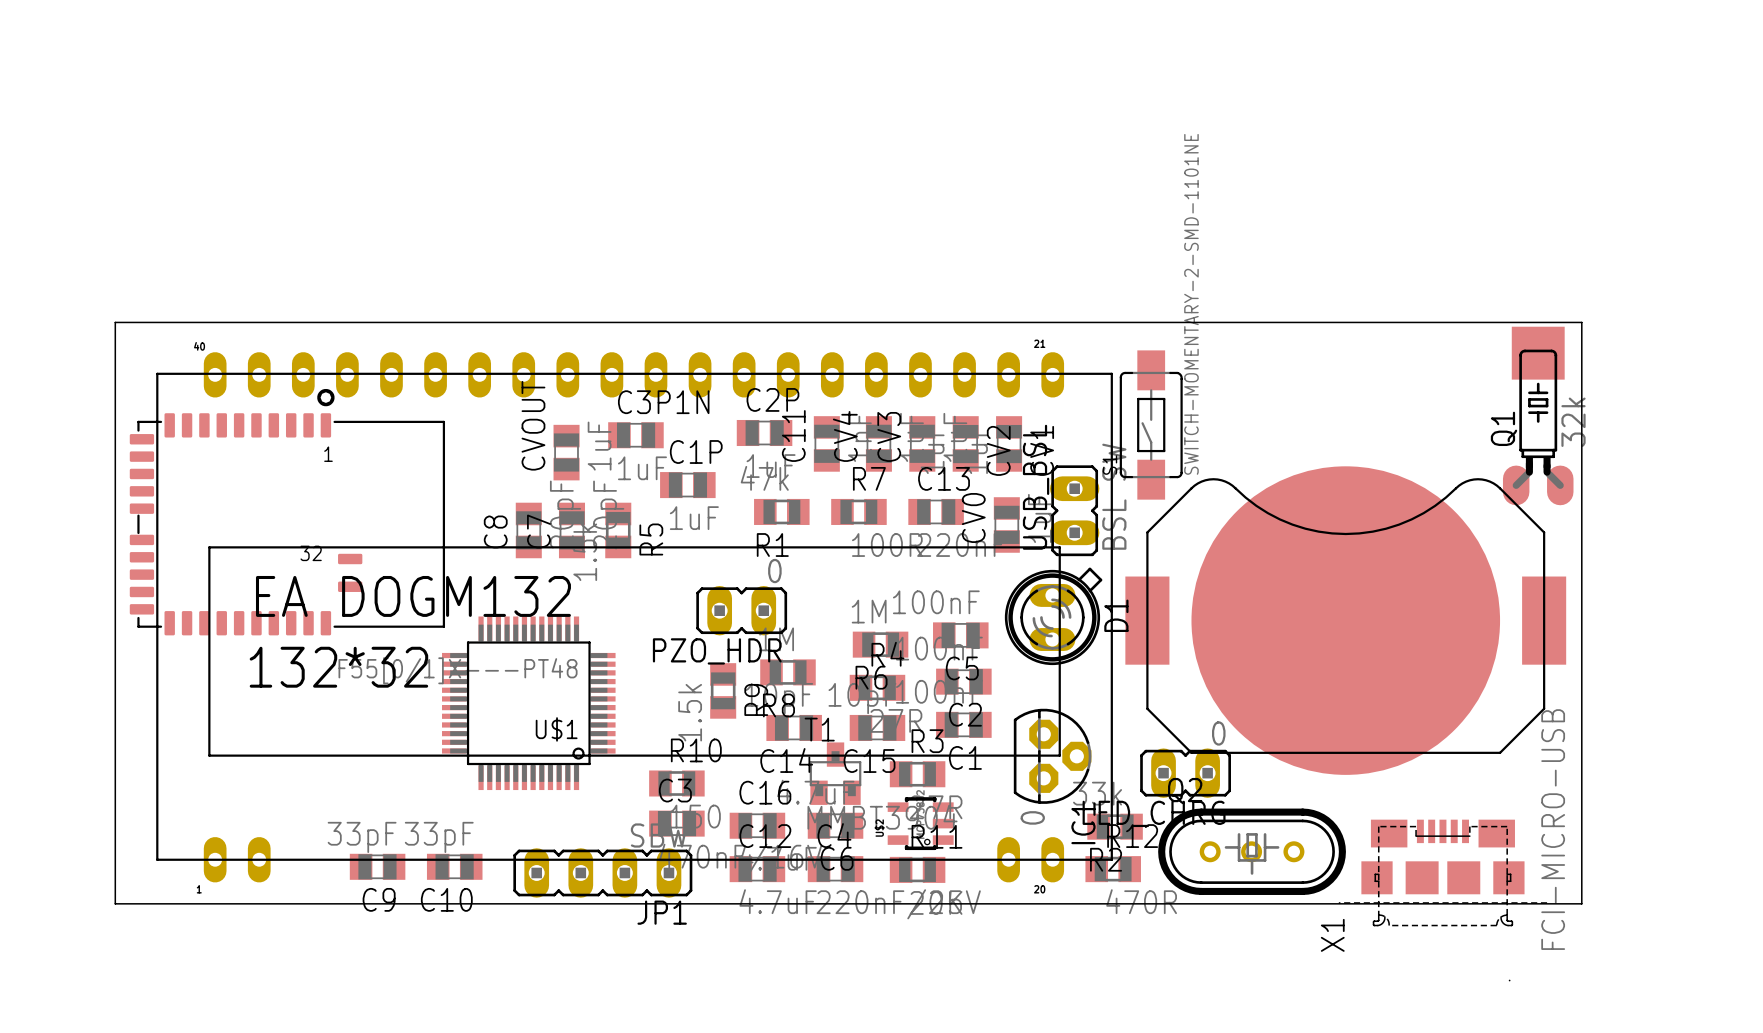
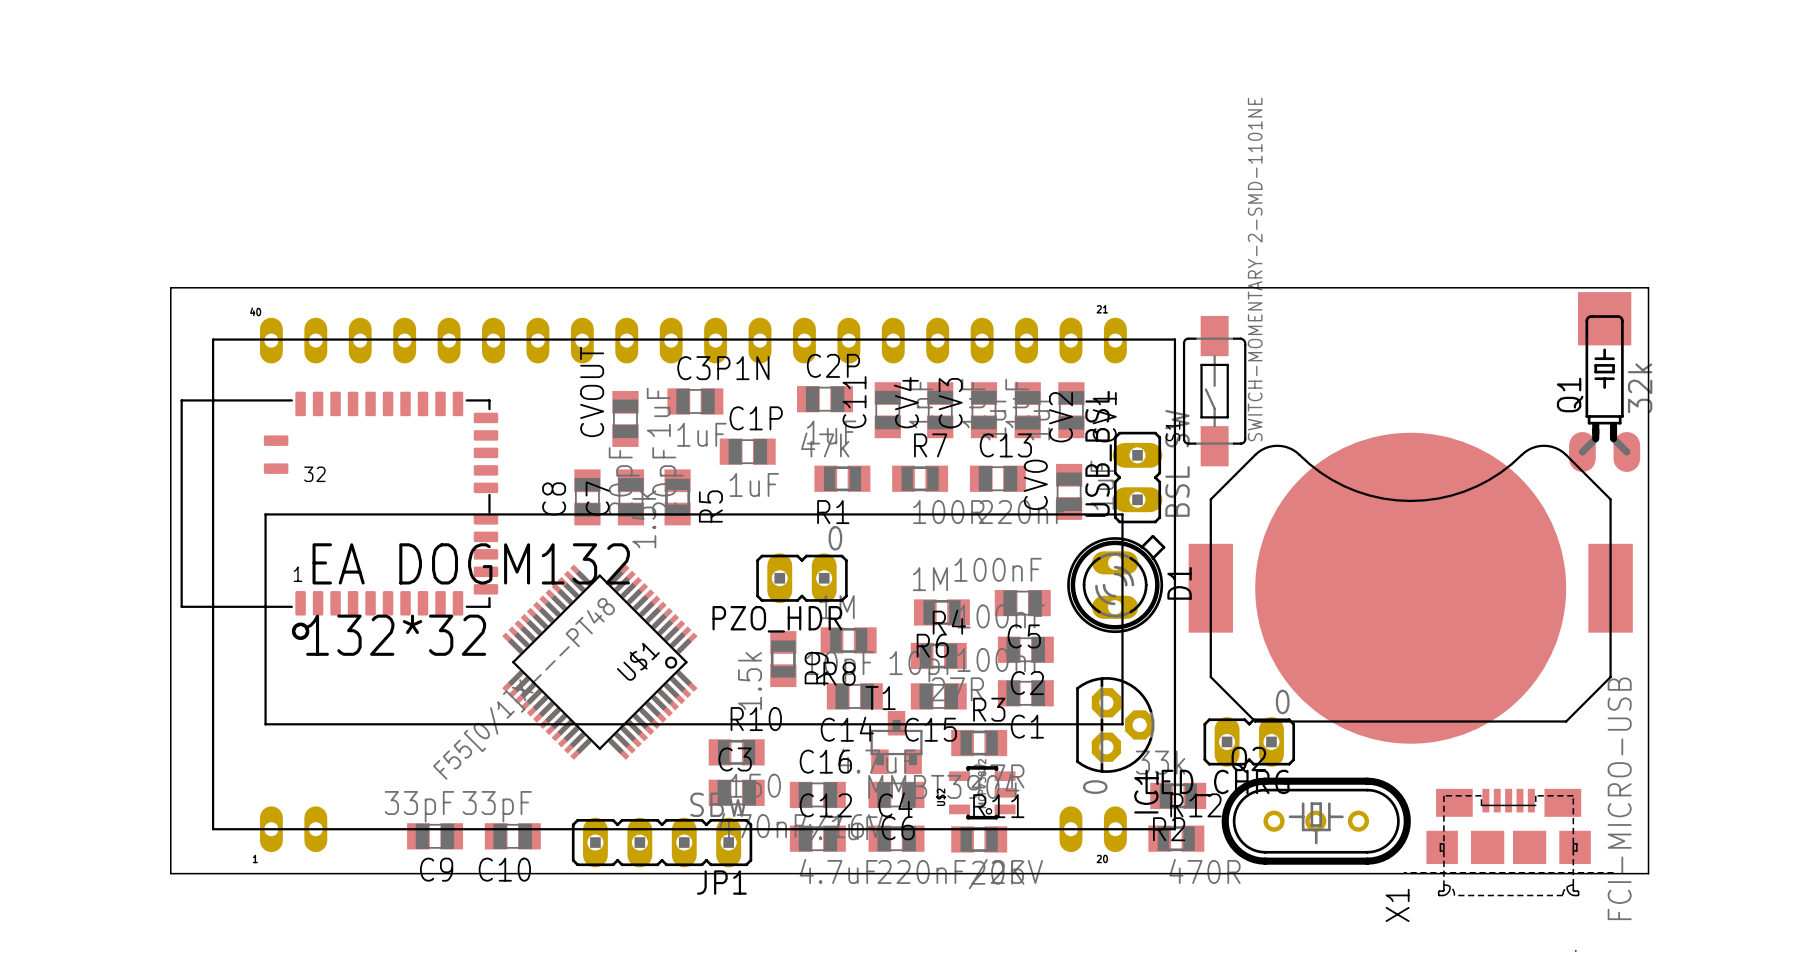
part: (287, 512) -> none
part: none -> (339, 515)
U$1 rotation: 0° (528, 703) -> 45° counterclockwise (599, 662)

